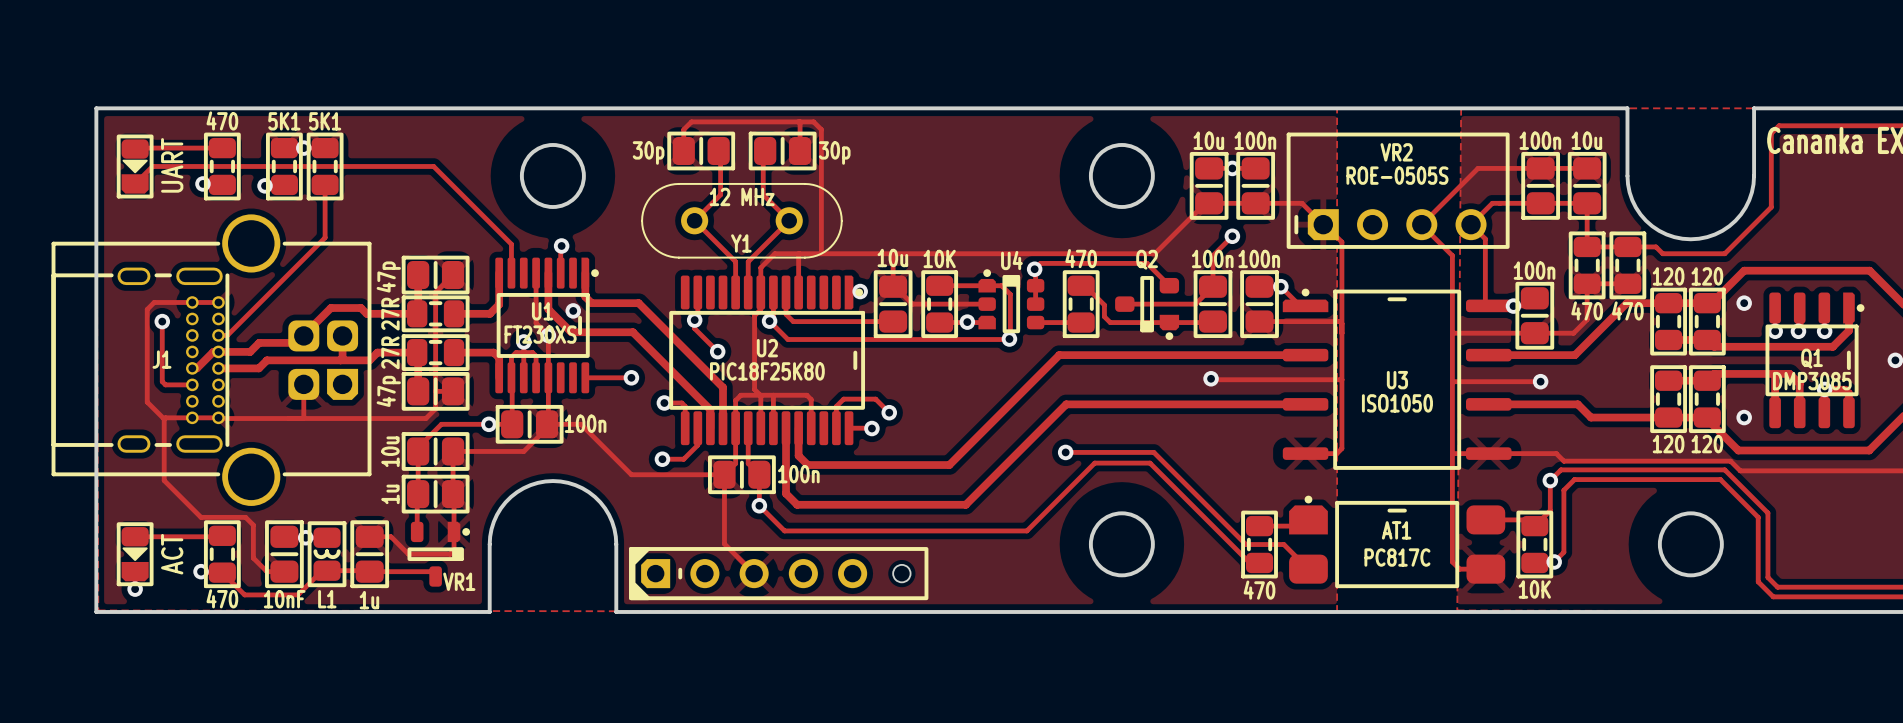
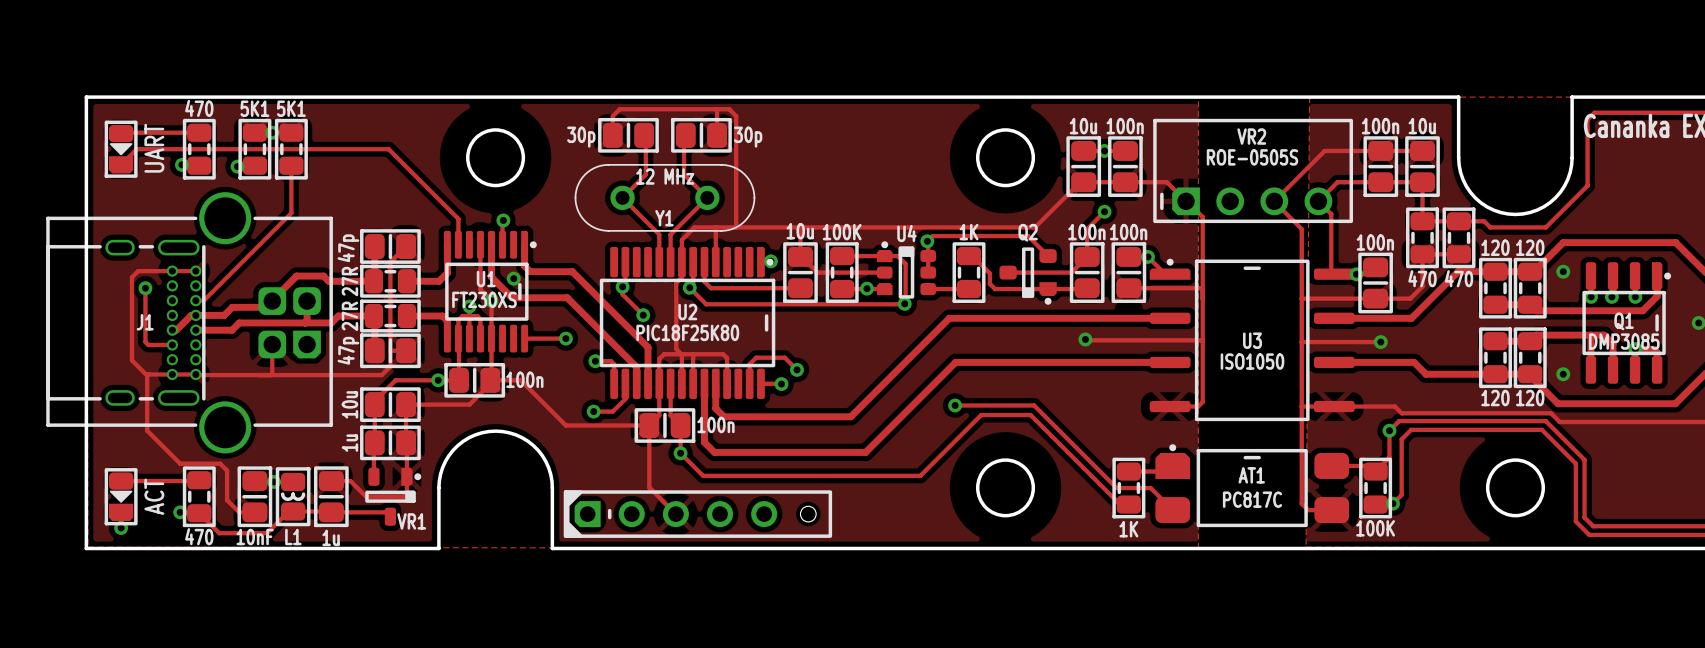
part value: 10K (939, 258) -> 100K (842, 232)
part value: 470 (1081, 258) -> 1K (969, 232)
part value: 10K (1534, 589) -> 100K (1375, 528)
part value: 470 (1259, 590) -> 1K (1128, 529)

